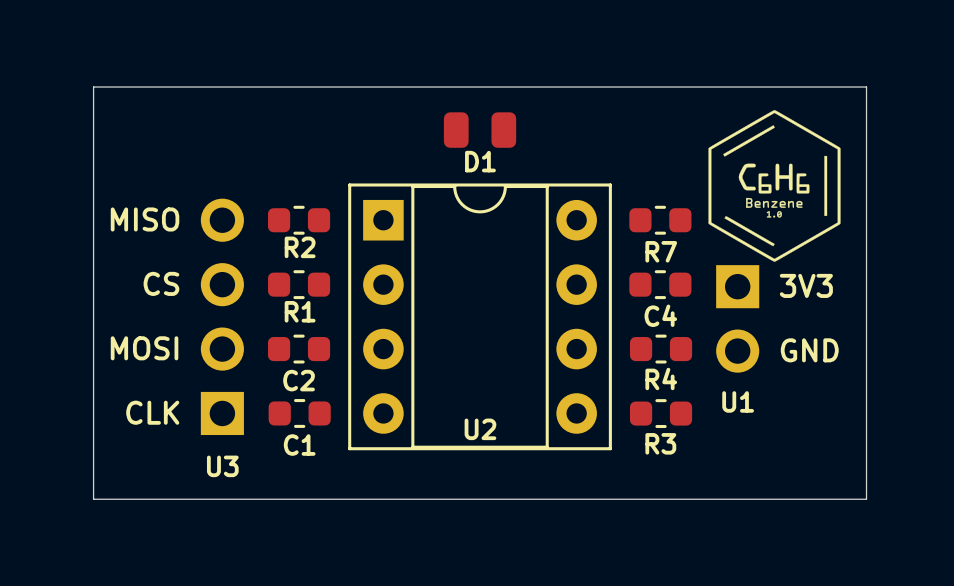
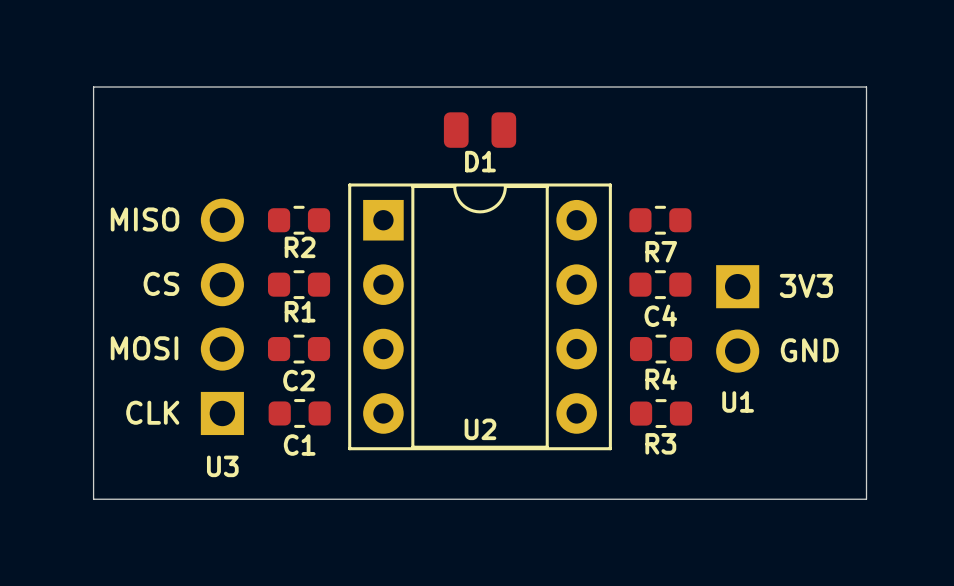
drawing: [708, 110, 841, 262] -> none

